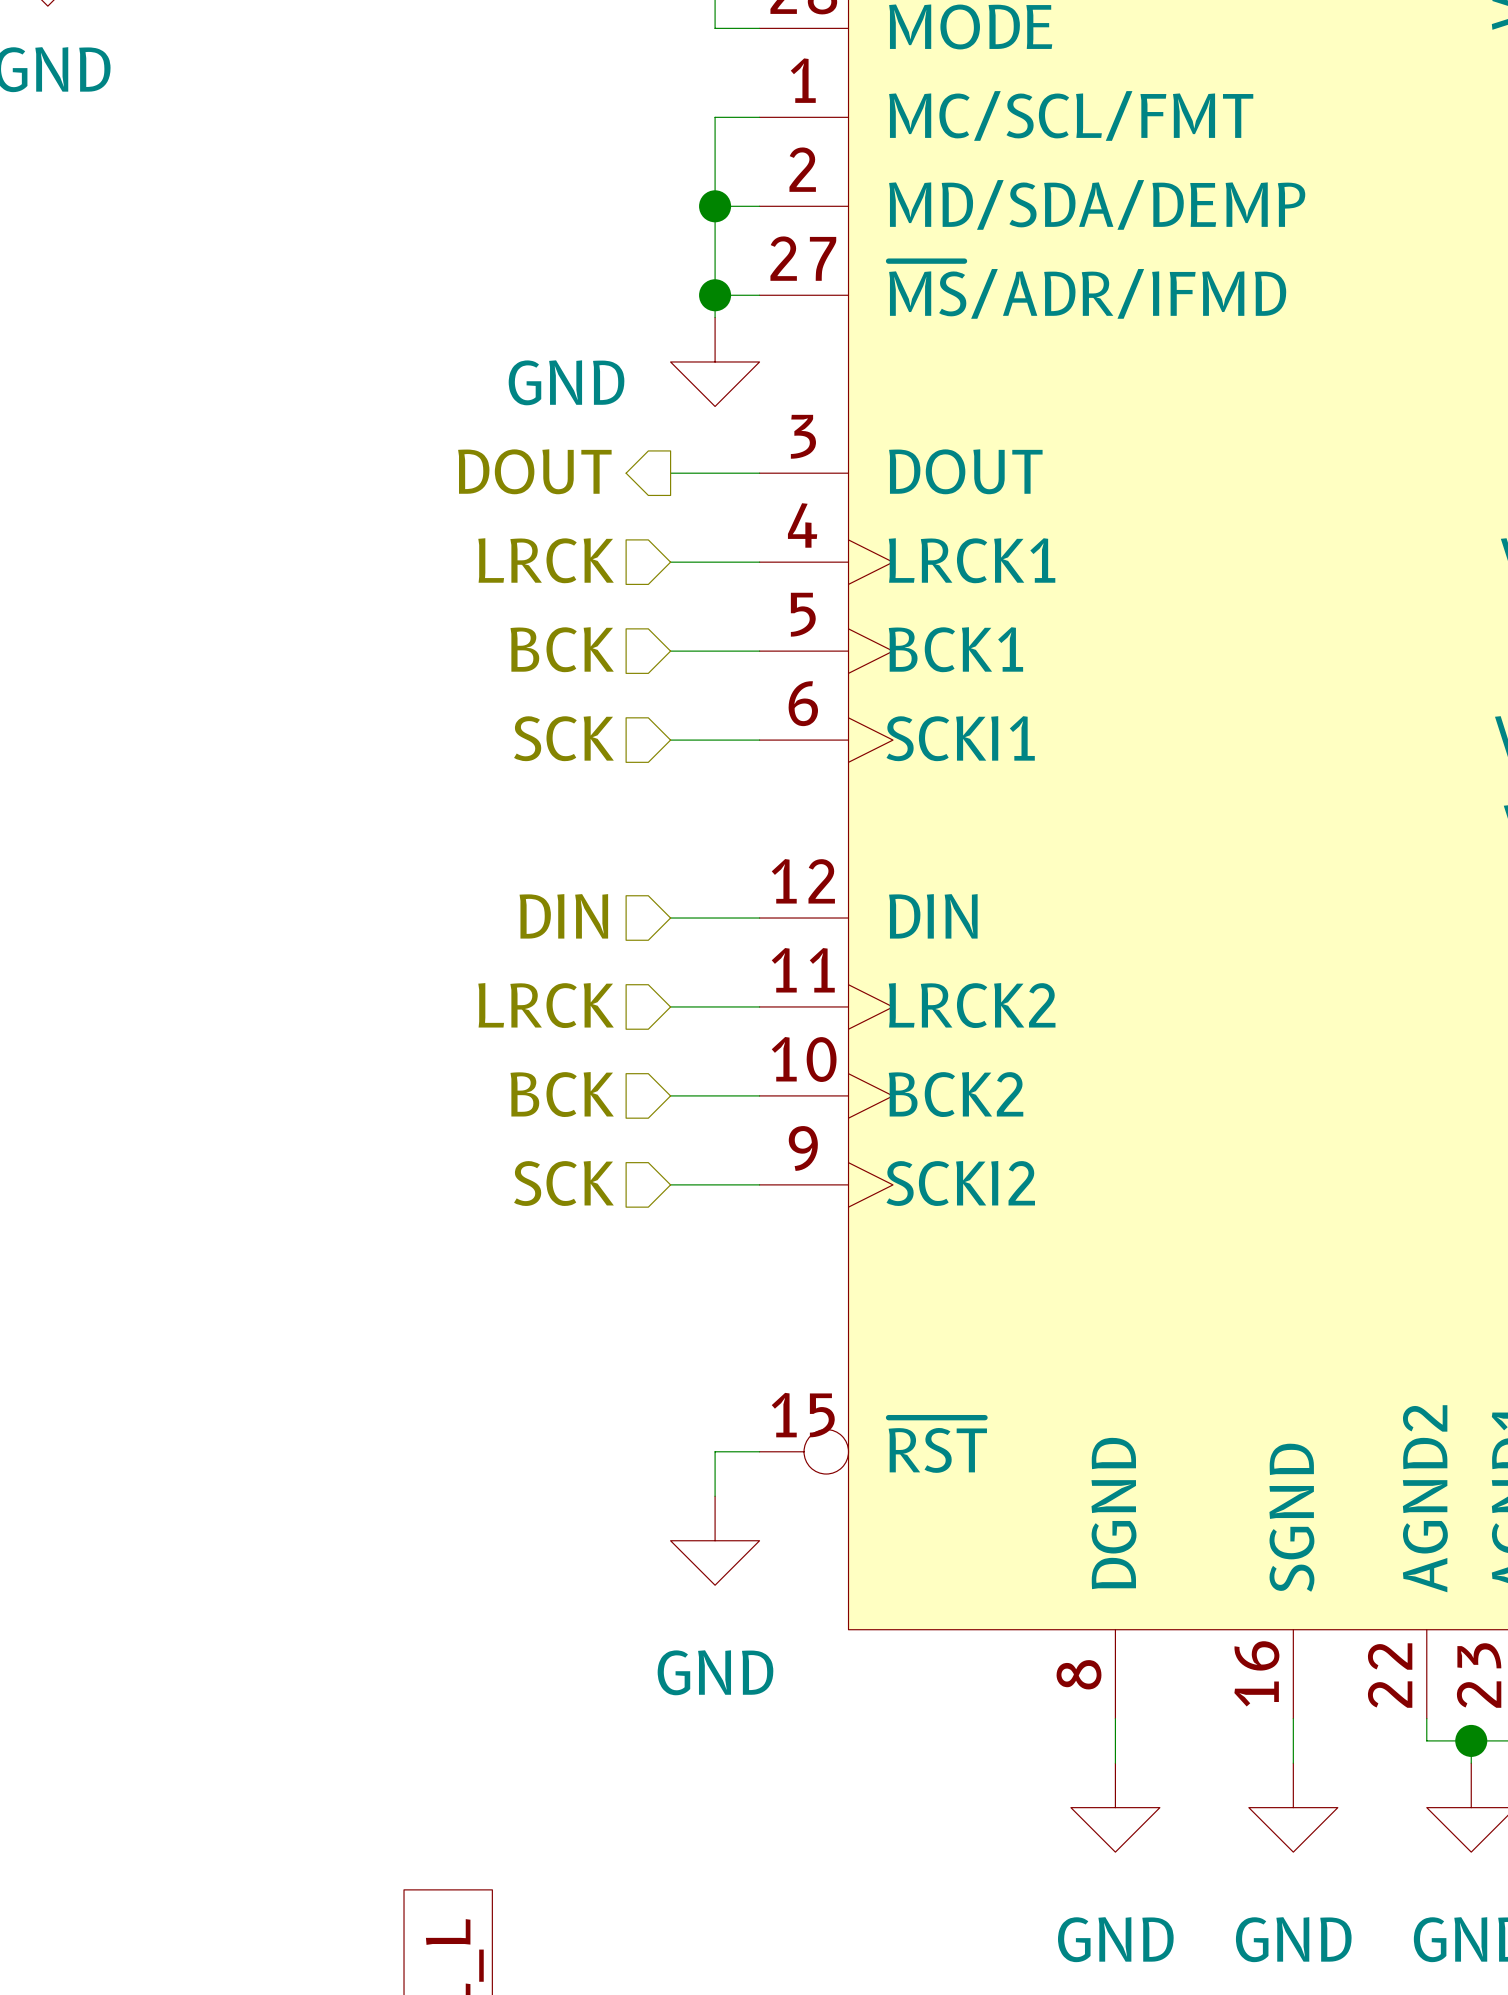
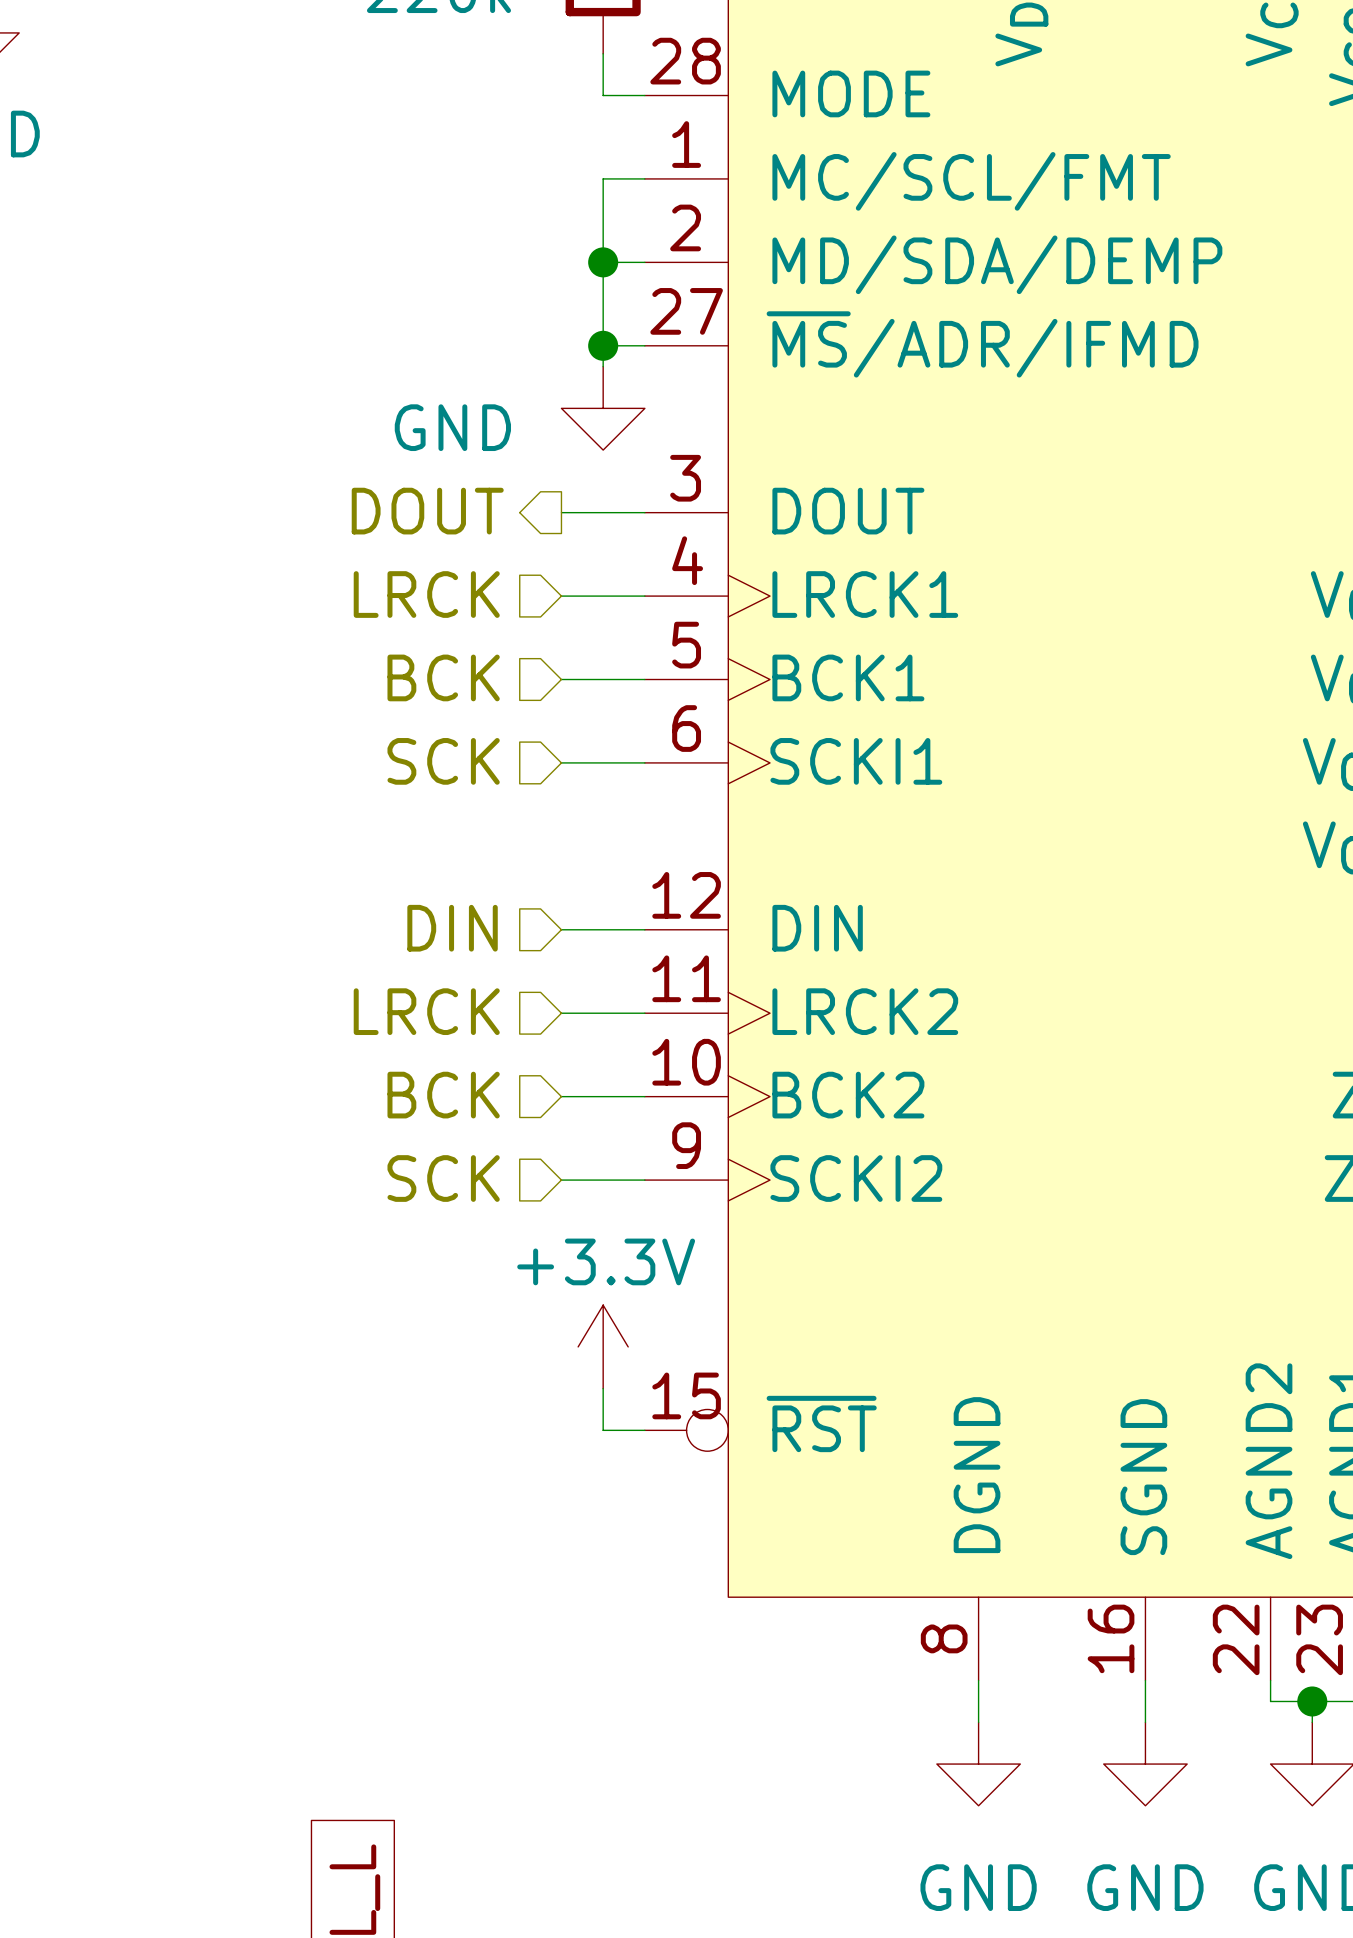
power symbol: none -> +3.3V (603, 1346)
wire: (715, 1451) (715, 1496) -> (603, 1430) (603, 1388)
power symbol: GND (715, 1540) -> none

